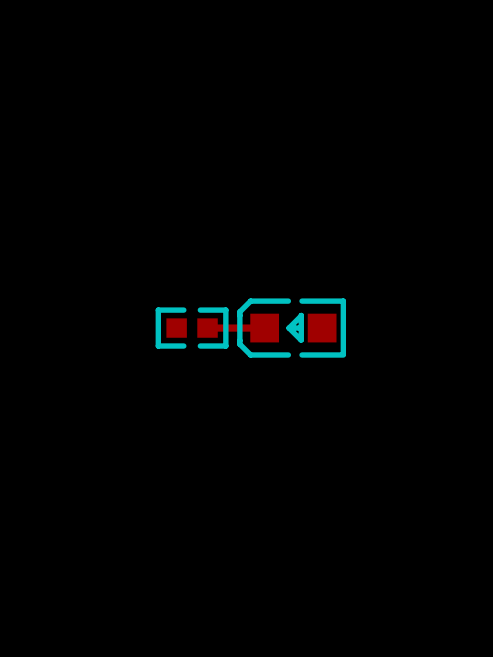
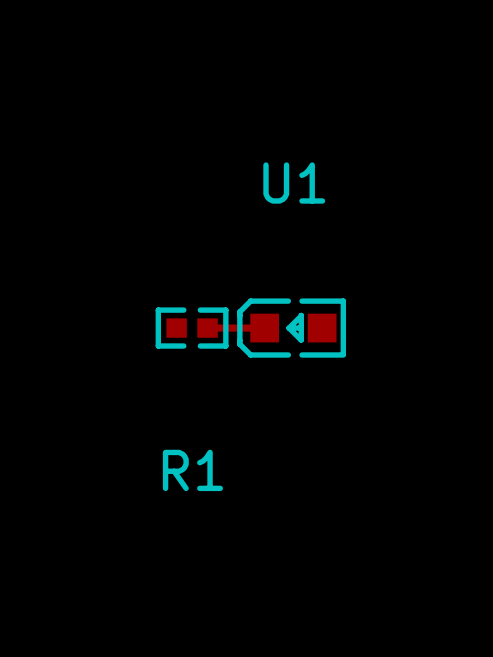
U1 name: none -> U1 (294, 183)
R1 name: none -> R1 (192, 470)

